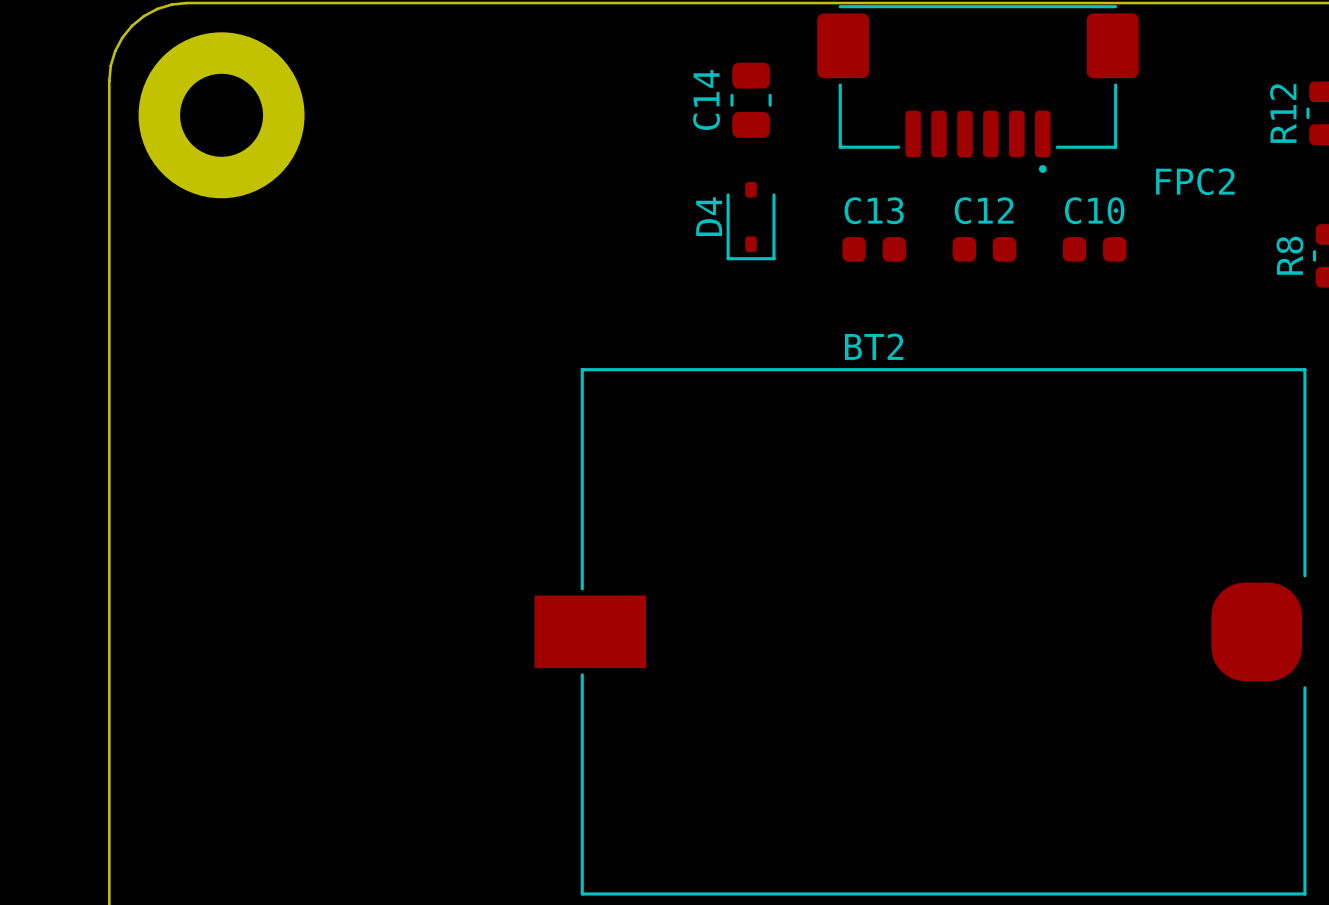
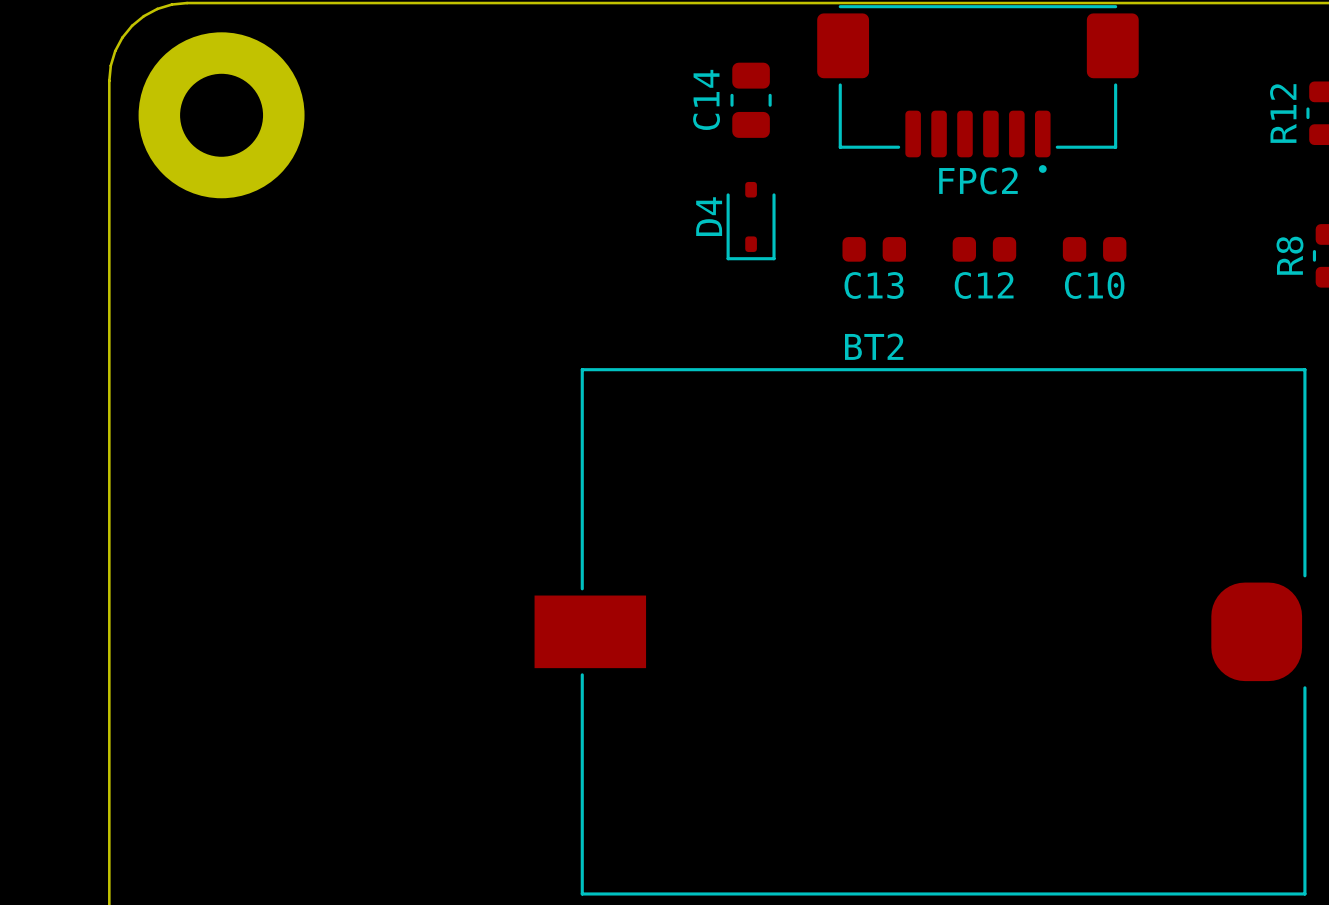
FPC2 name position: FPC2 (1195, 181) -> FPC2 (978, 181)
C13 name position: C13 (874, 210) -> C13 (874, 285)
C12 name position: C12 (984, 210) -> C12 (984, 285)
C10 name position: C10 (1094, 210) -> C10 (1094, 285)

